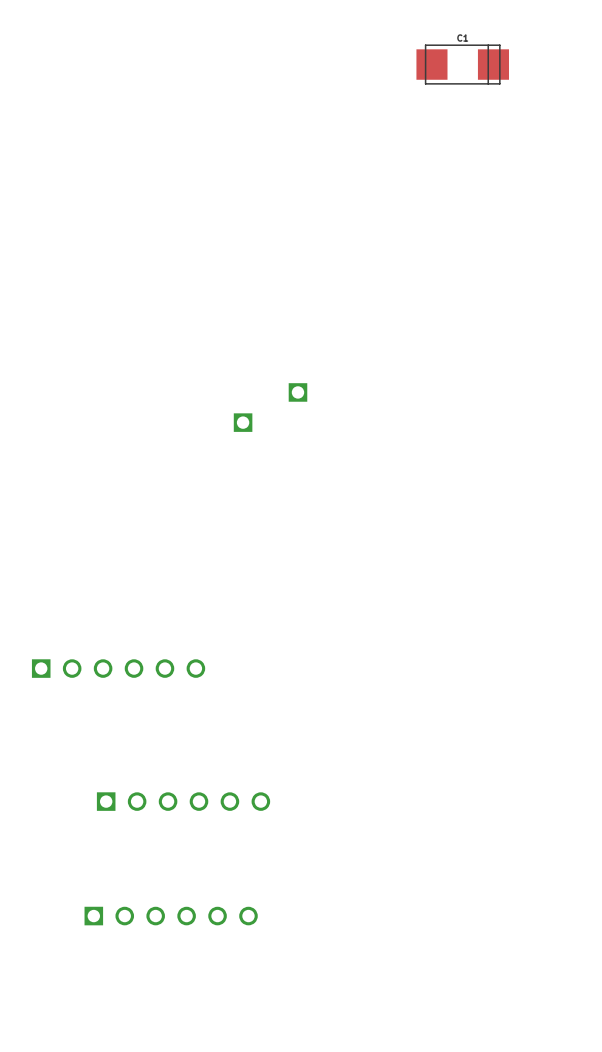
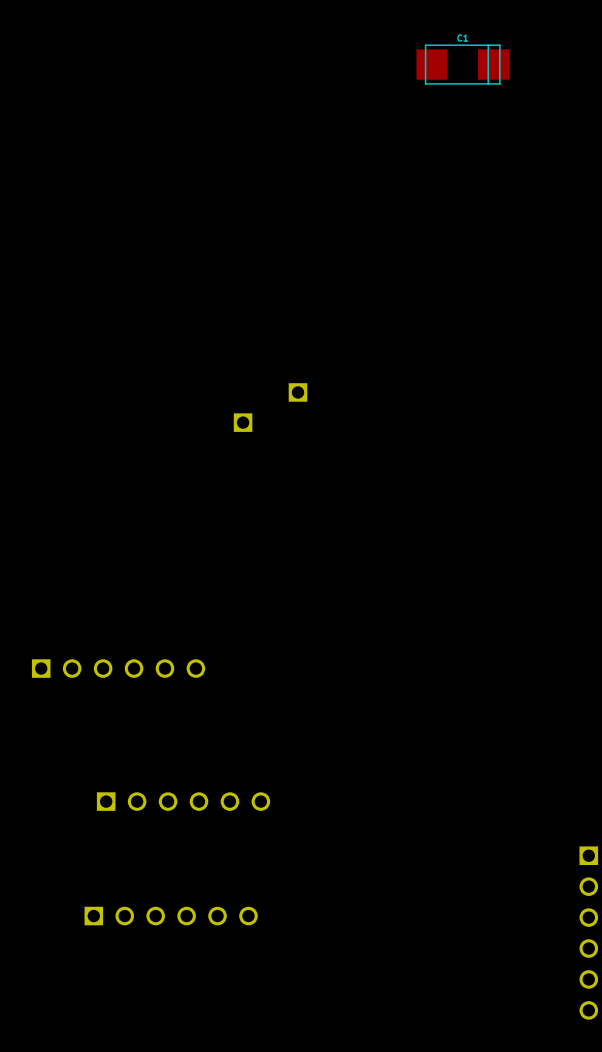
part: none -> (588, 933)

